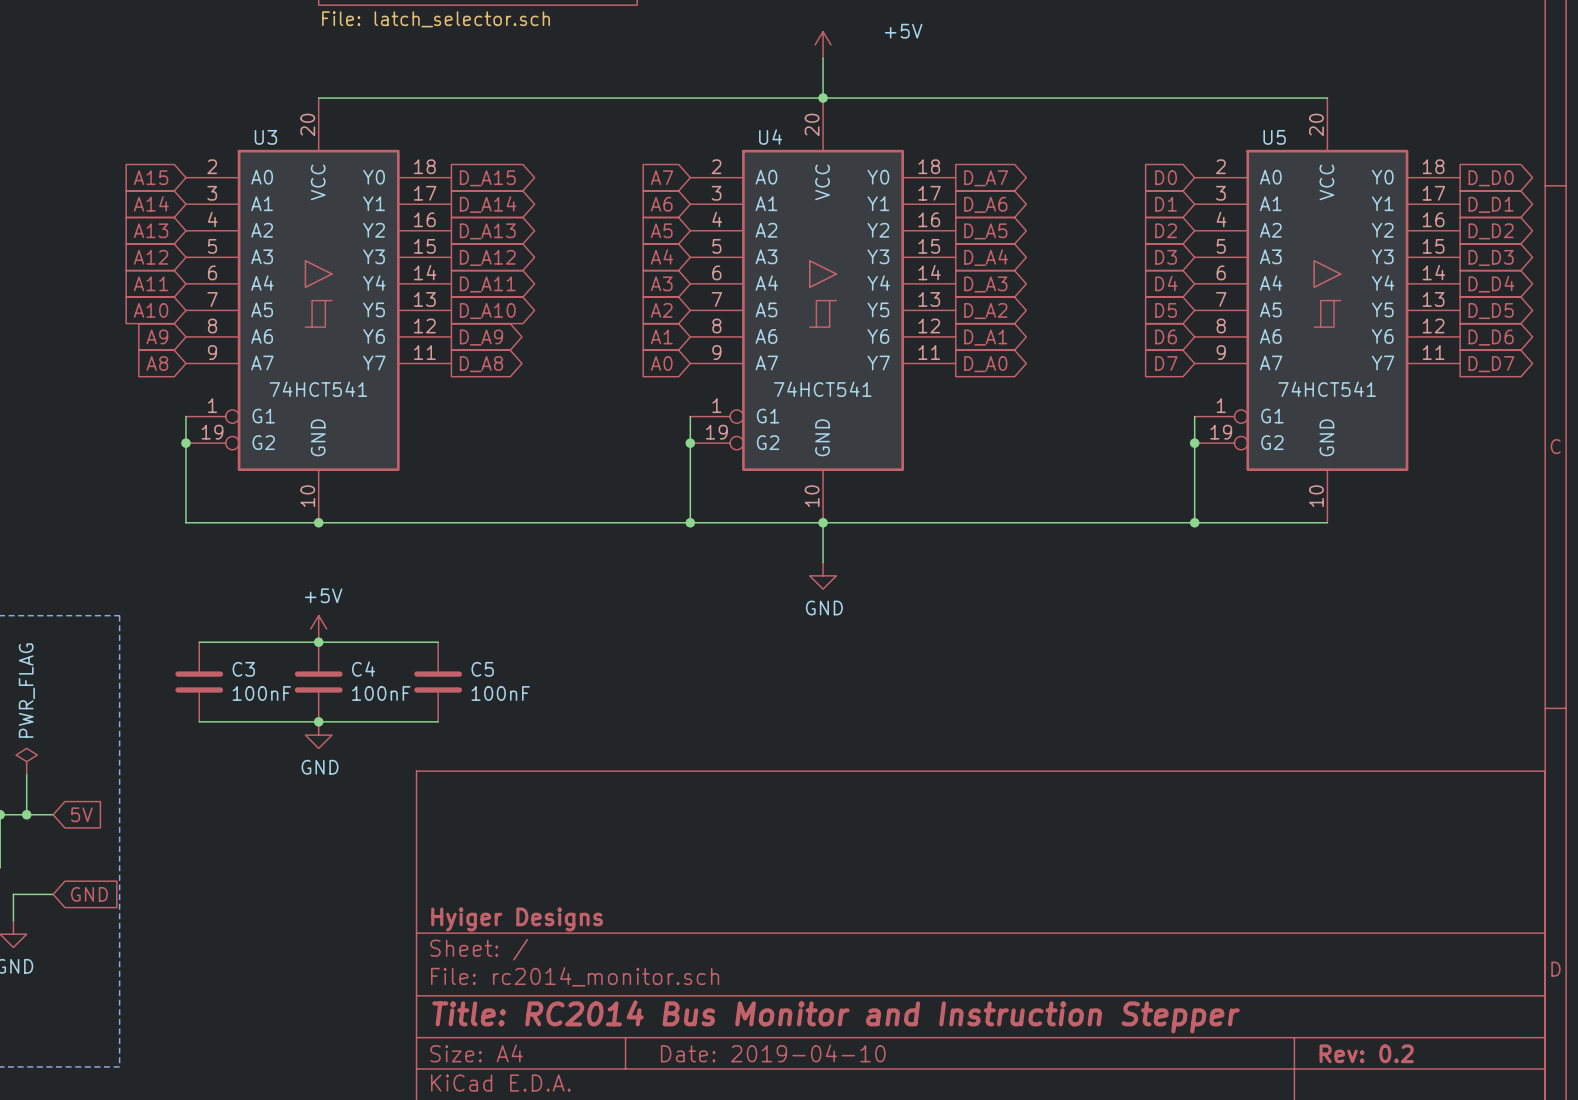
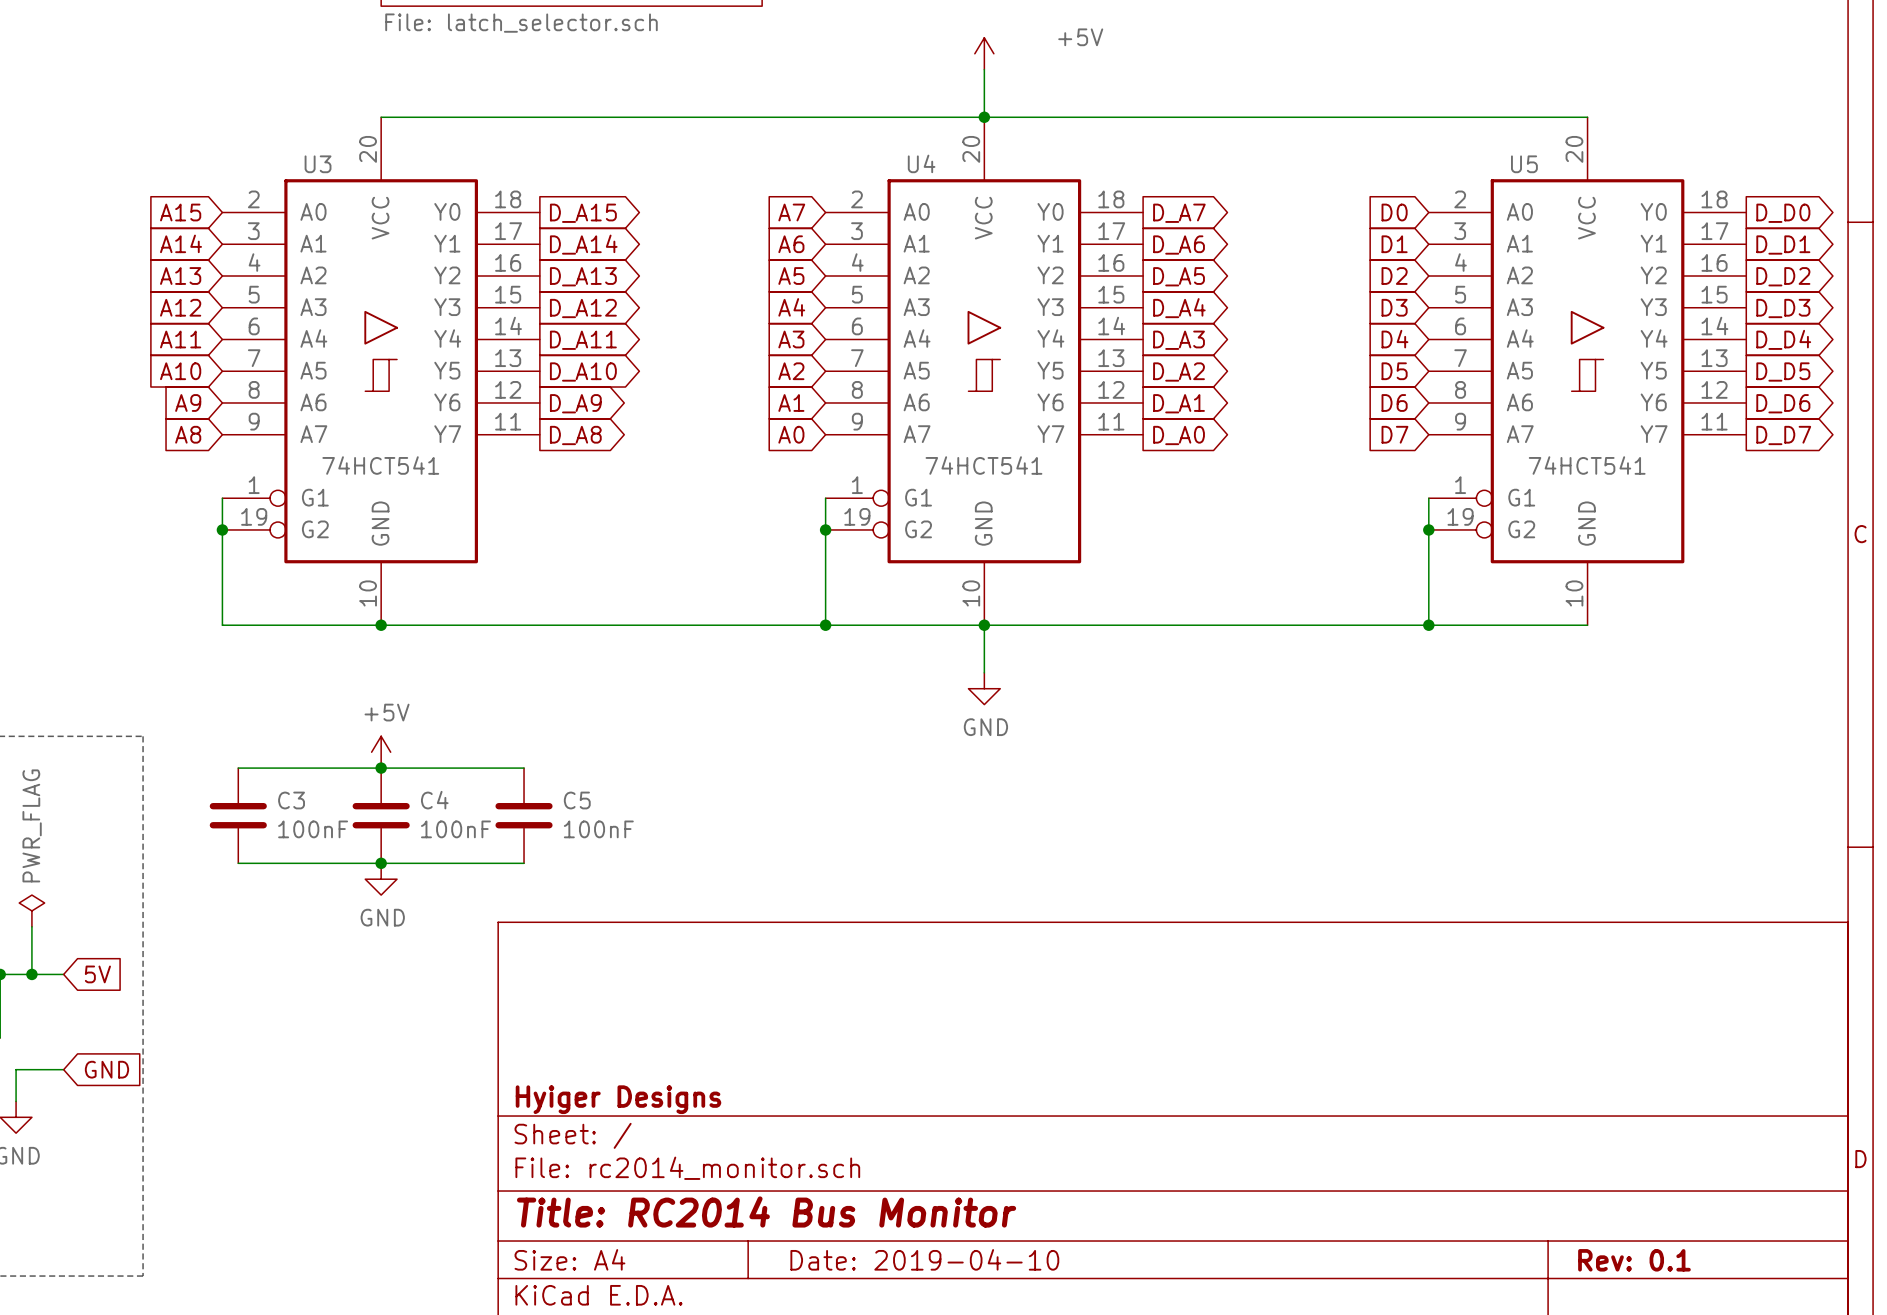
title block: Title: RC2014 Bus Monitor and Instruction Stepper (836, 1016) -> Title: RC2014 Bus Monitor (766, 1211)
title block: Rev: 0.2 (1366, 1053) -> Rev: 0.1 (1634, 1260)

